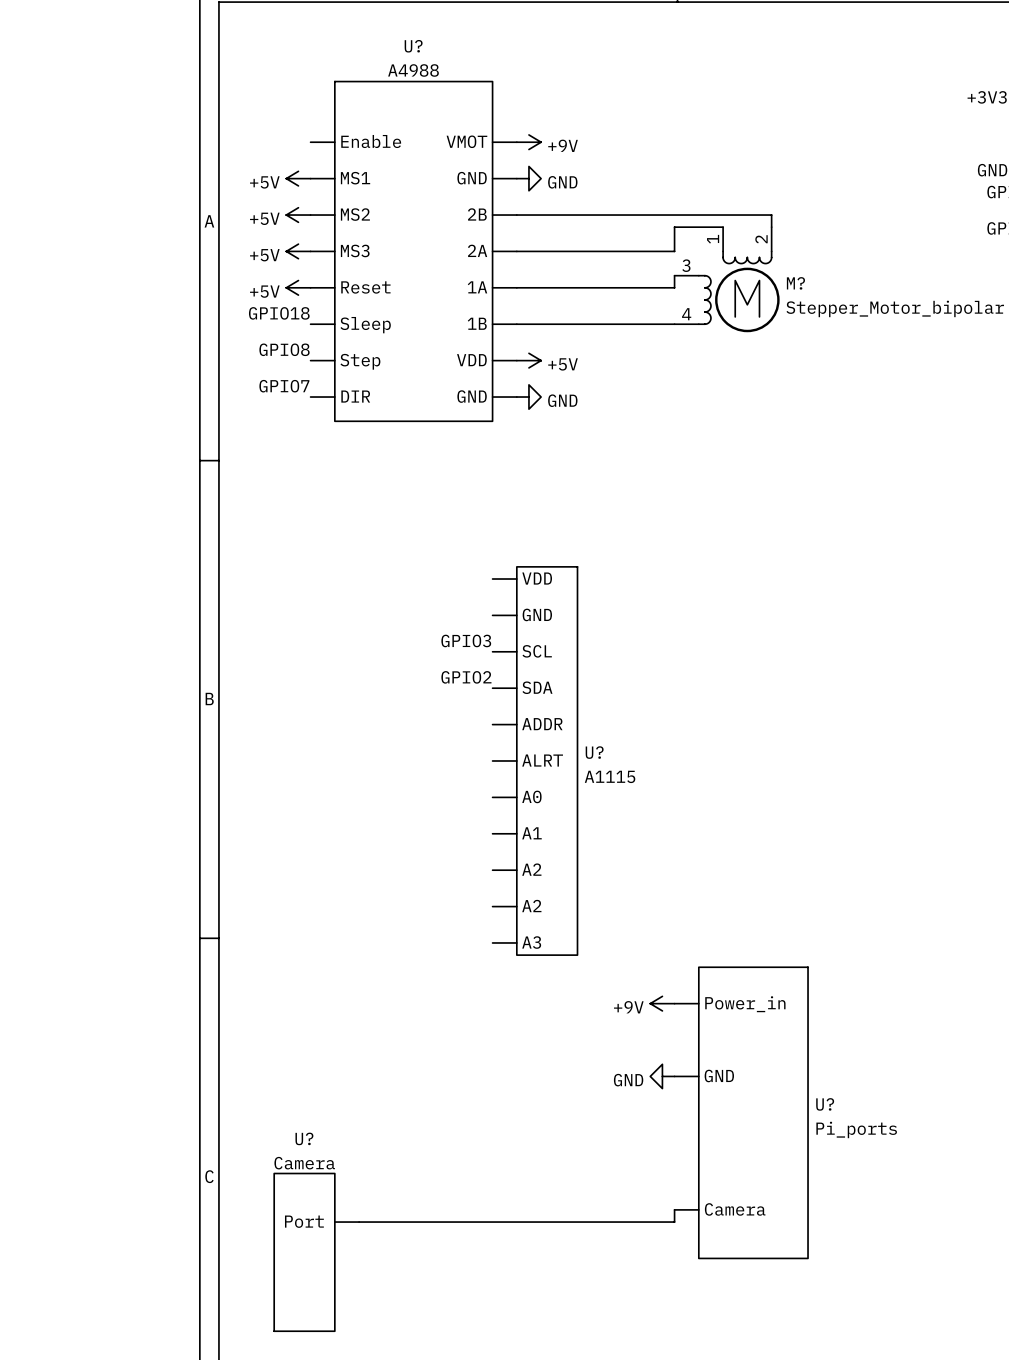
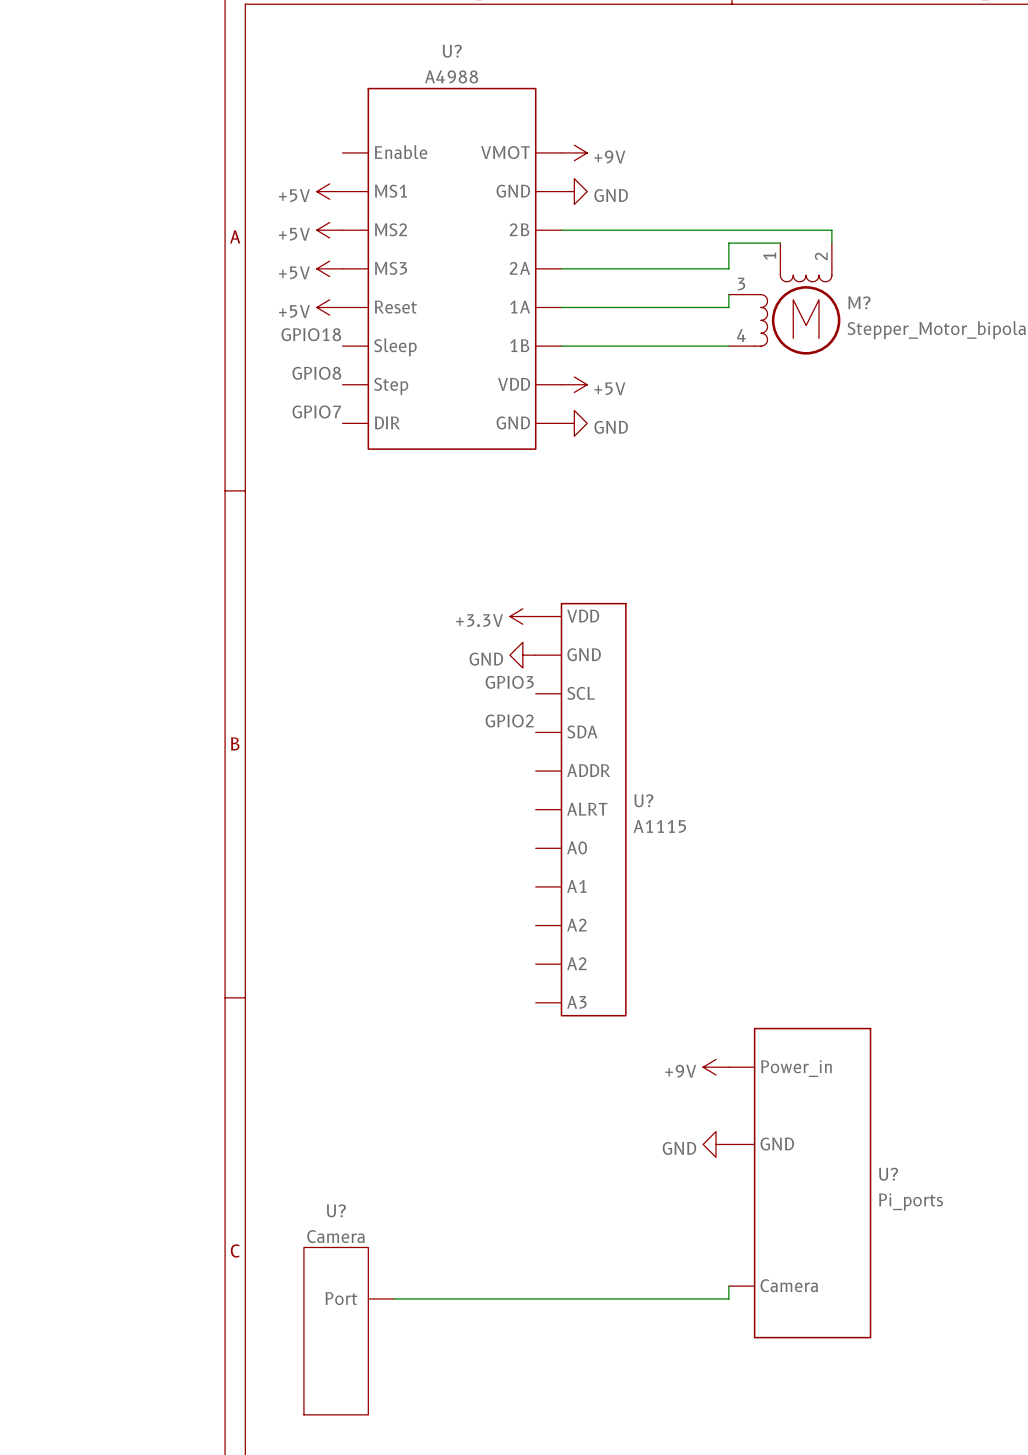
power symbol: none -> +3.3V (522, 616)
power symbol: none -> GND (522, 655)

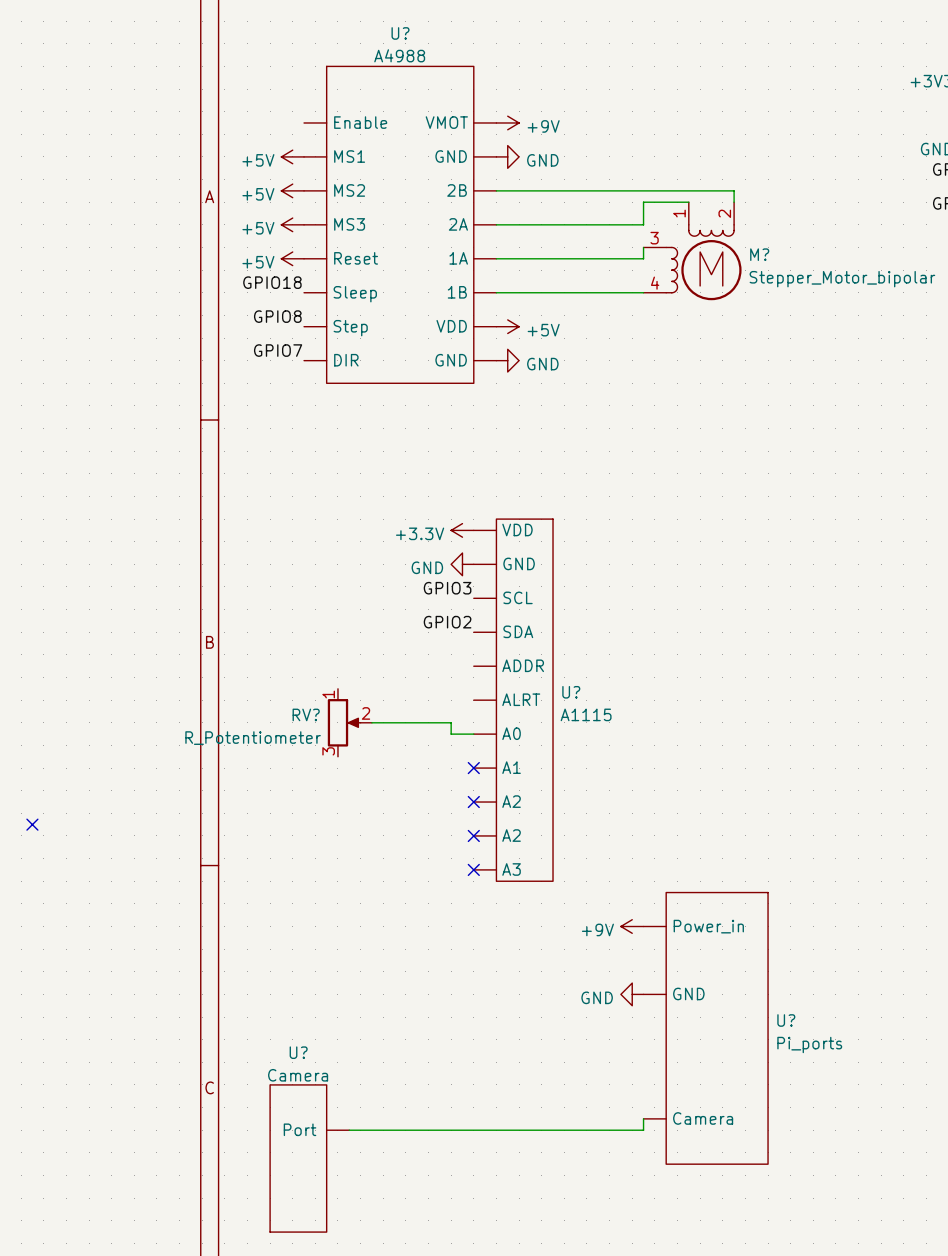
RV?: none -> R_Potentiometer (349, 722)
wire: none -> (371, 722) (451, 722) (451, 734) (473, 734)
no-connect mark: none -> (473, 768)
no-connect mark: none -> (473, 802)
no-connect mark: none -> (32, 824)
no-connect mark: none -> (473, 835)
no-connect mark: none -> (473, 869)

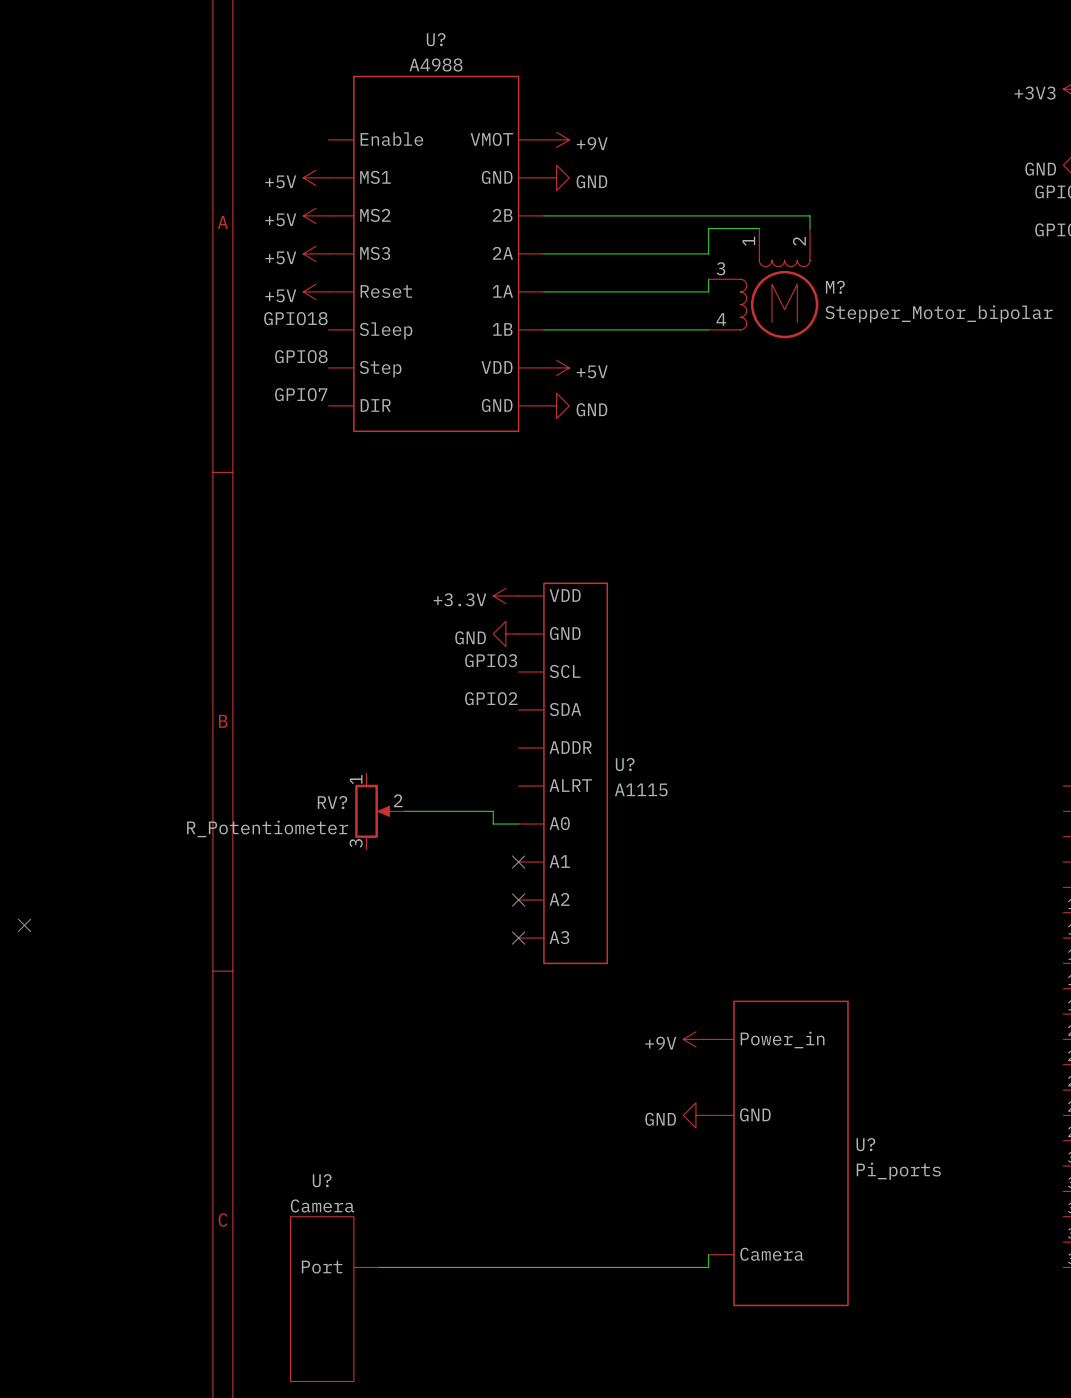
U?: none -> A1115 (563, 773)
U?: A1115 (513, 700) -> none
no-connect mark: (473, 869) -> none

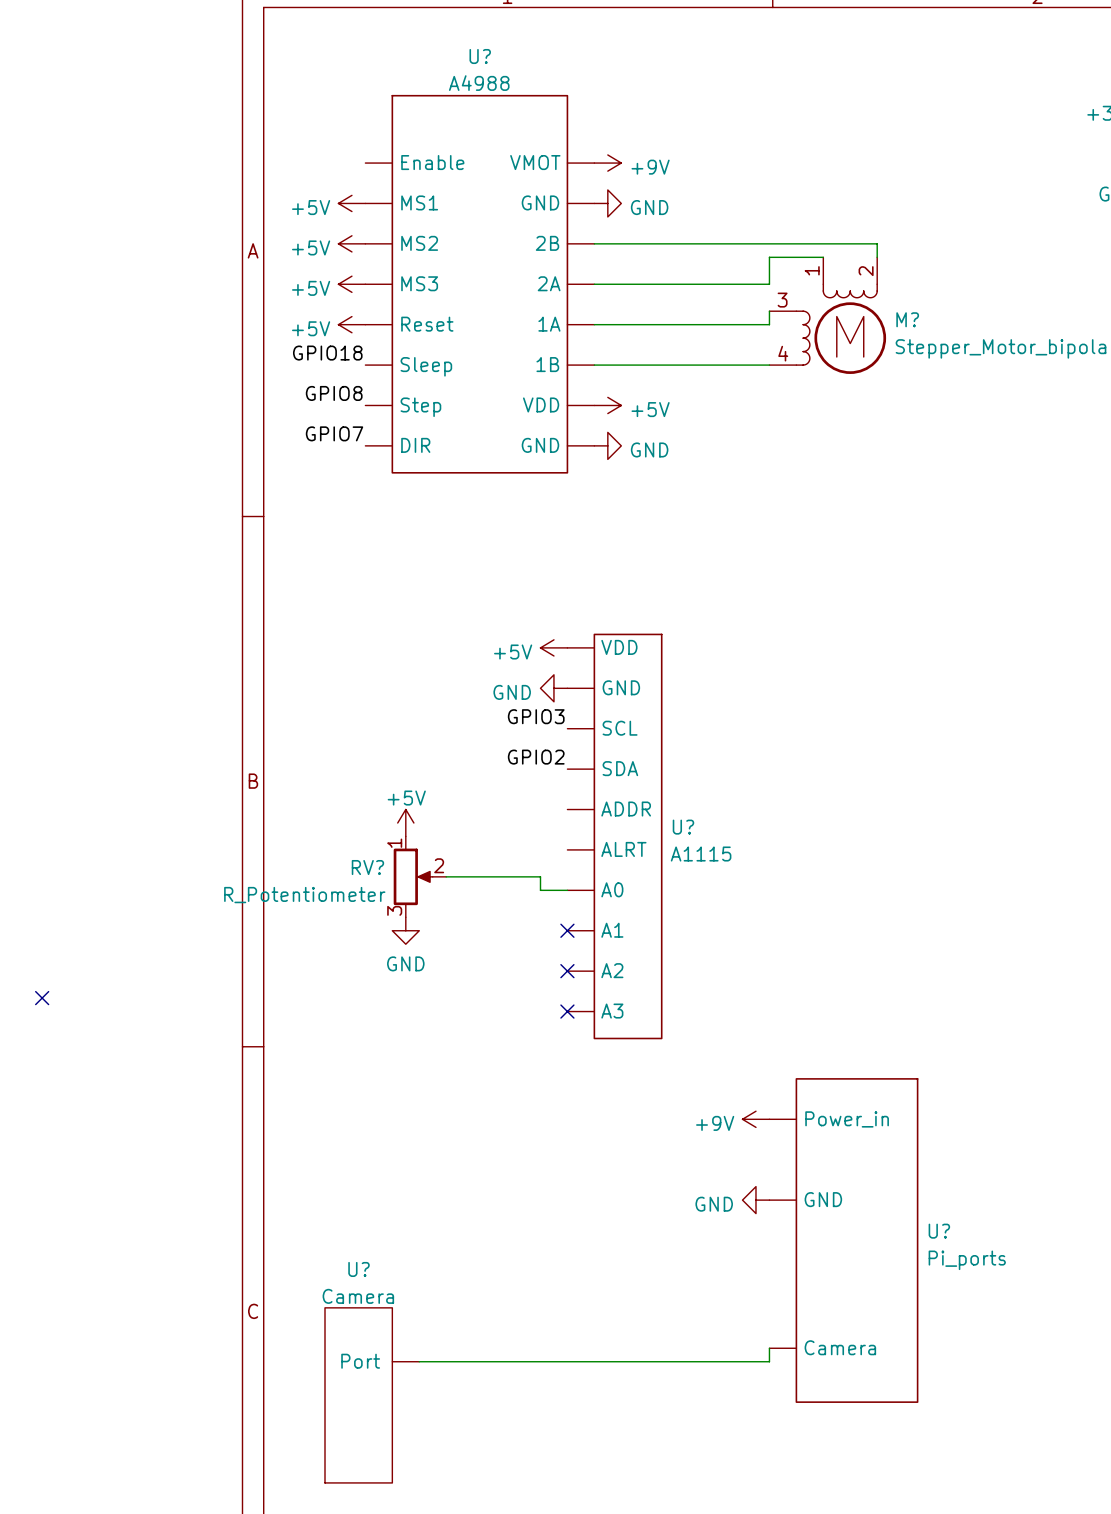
power symbol: +3.3V (505, 595) -> +5V (553, 647)
power symbol: none -> +5V (405, 823)
power symbol: none -> GND (405, 930)

